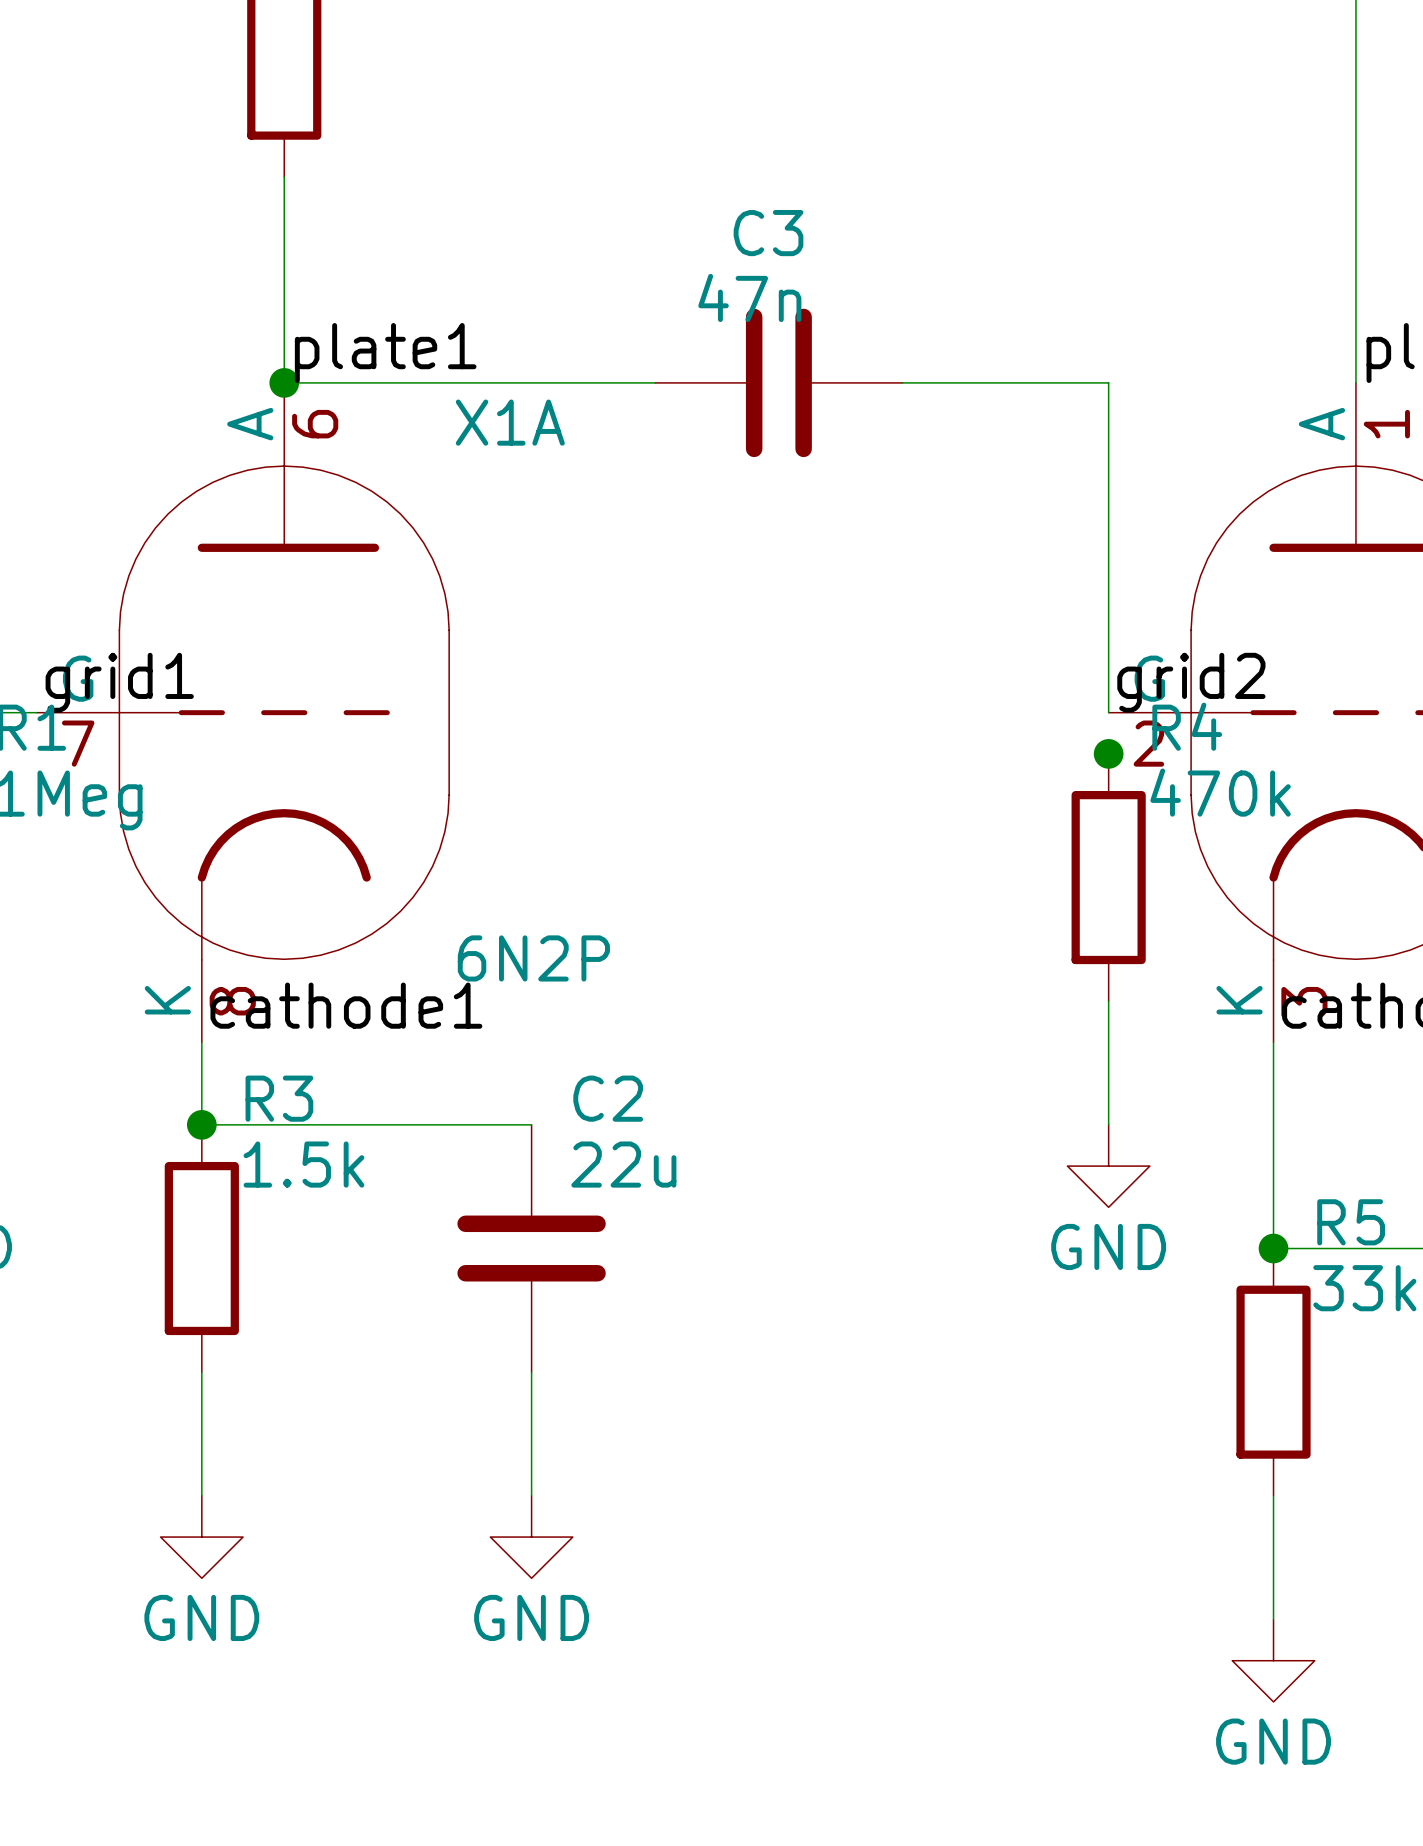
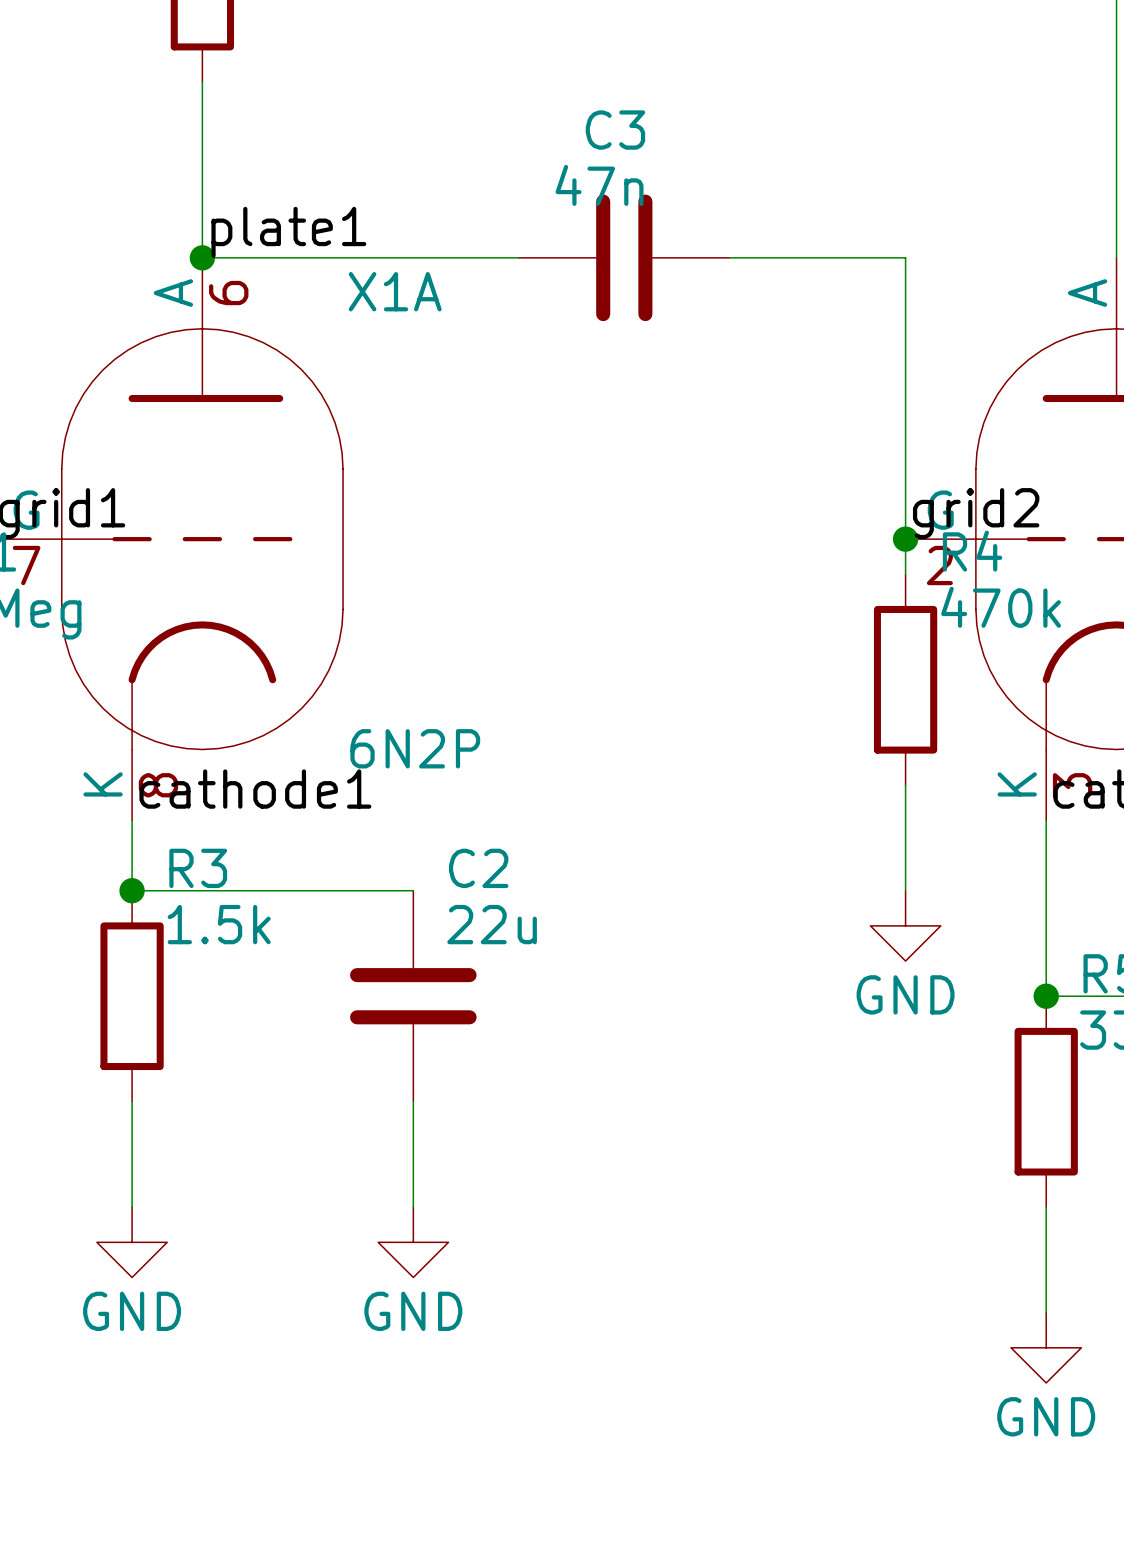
wire: none -> (905, 539) (905, 574)
junction position: (1108, 753) -> (905, 539)

